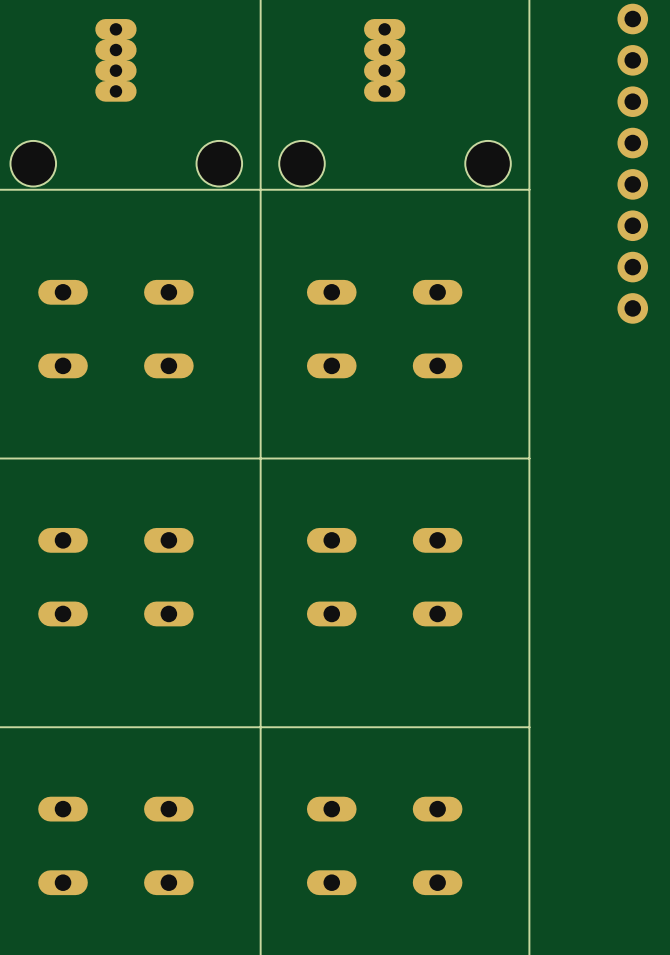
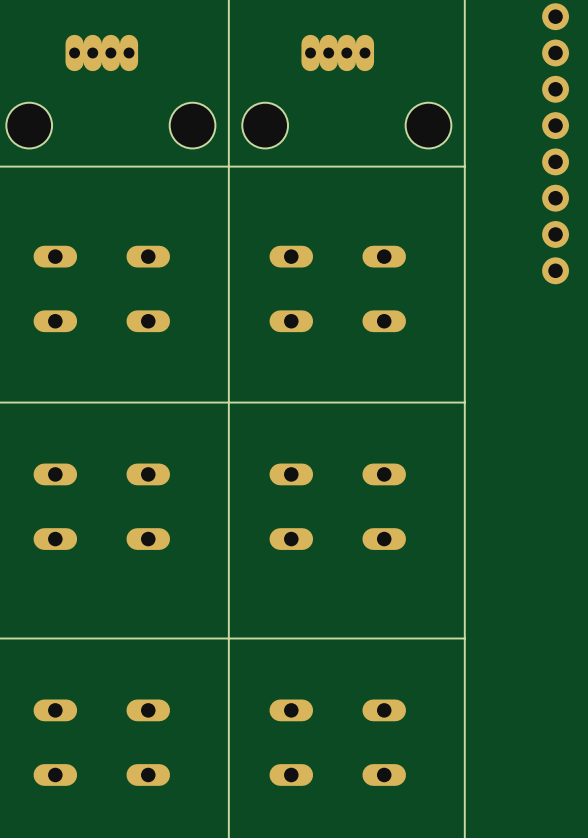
part rotation: 0° (115, 60) -> 90° clockwise (101, 52)
part rotation: 0° (384, 60) -> 90° clockwise (337, 52)
hole: none -> (29, 125)
hole: none -> (192, 125)
hole: none -> (265, 125)
hole: none -> (428, 125)
hole: (33, 163) -> none
hole: (219, 163) -> none
hole: (302, 163) -> none
hole: (488, 163) -> none

